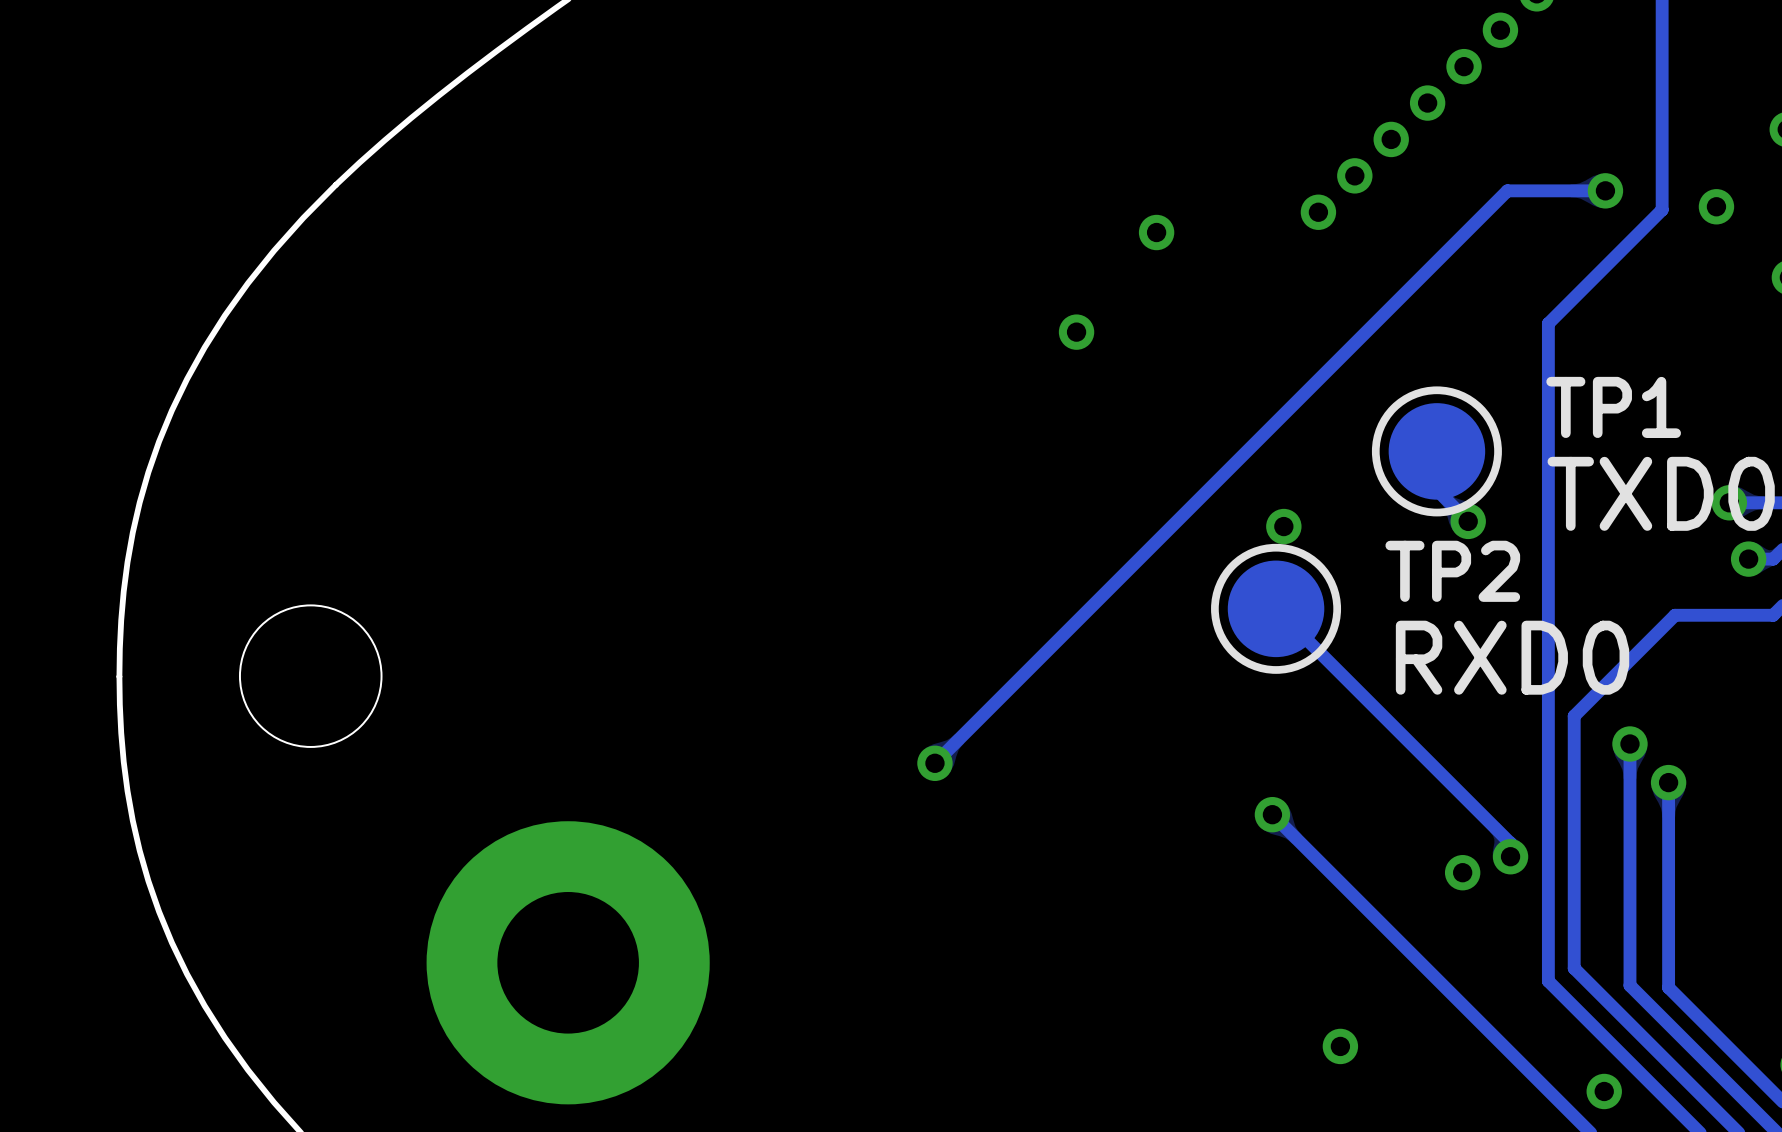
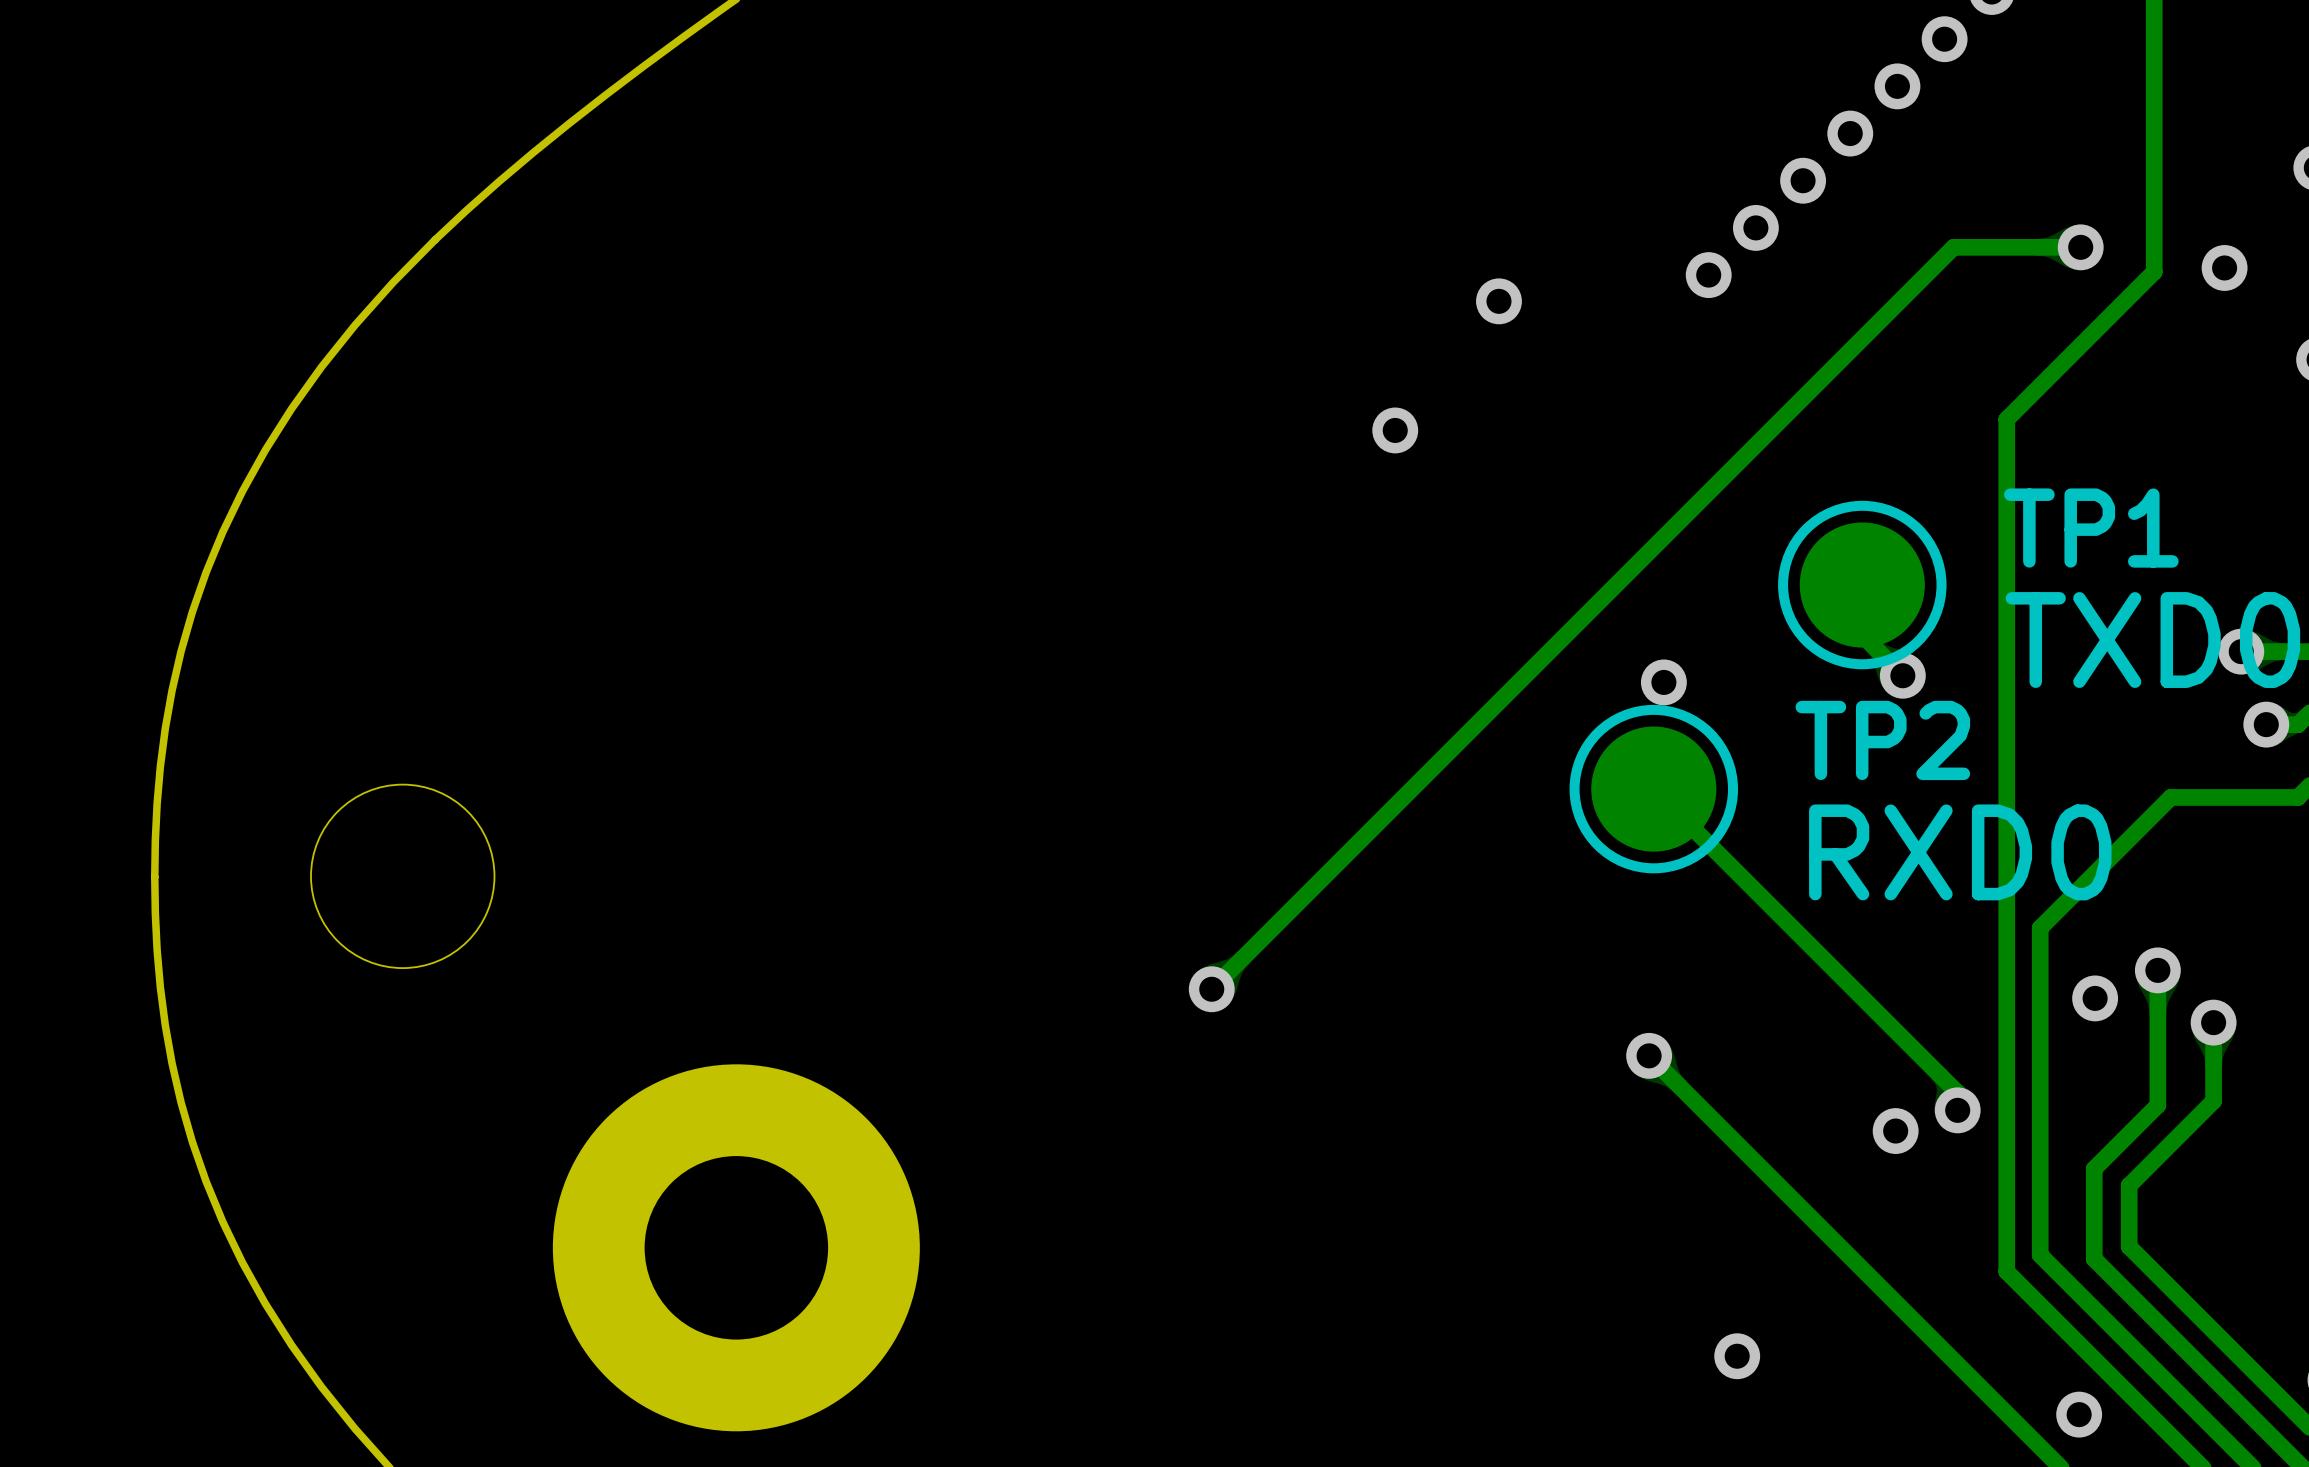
track: (1629, 743) (1629, 985) -> (2157, 970) (2157, 1105) (2094, 1168) (2094, 1259) (2112, 1277)
via: (1629, 743) -> none
via: none -> (2157, 970)
via: none -> (2095, 998)
track: (1668, 782) (1668, 987) -> (2213, 1022) (2213, 1101) (2129, 1185) (2129, 1246) (2162, 1280)
via: (1668, 782) -> none
via: none -> (2213, 1022)

